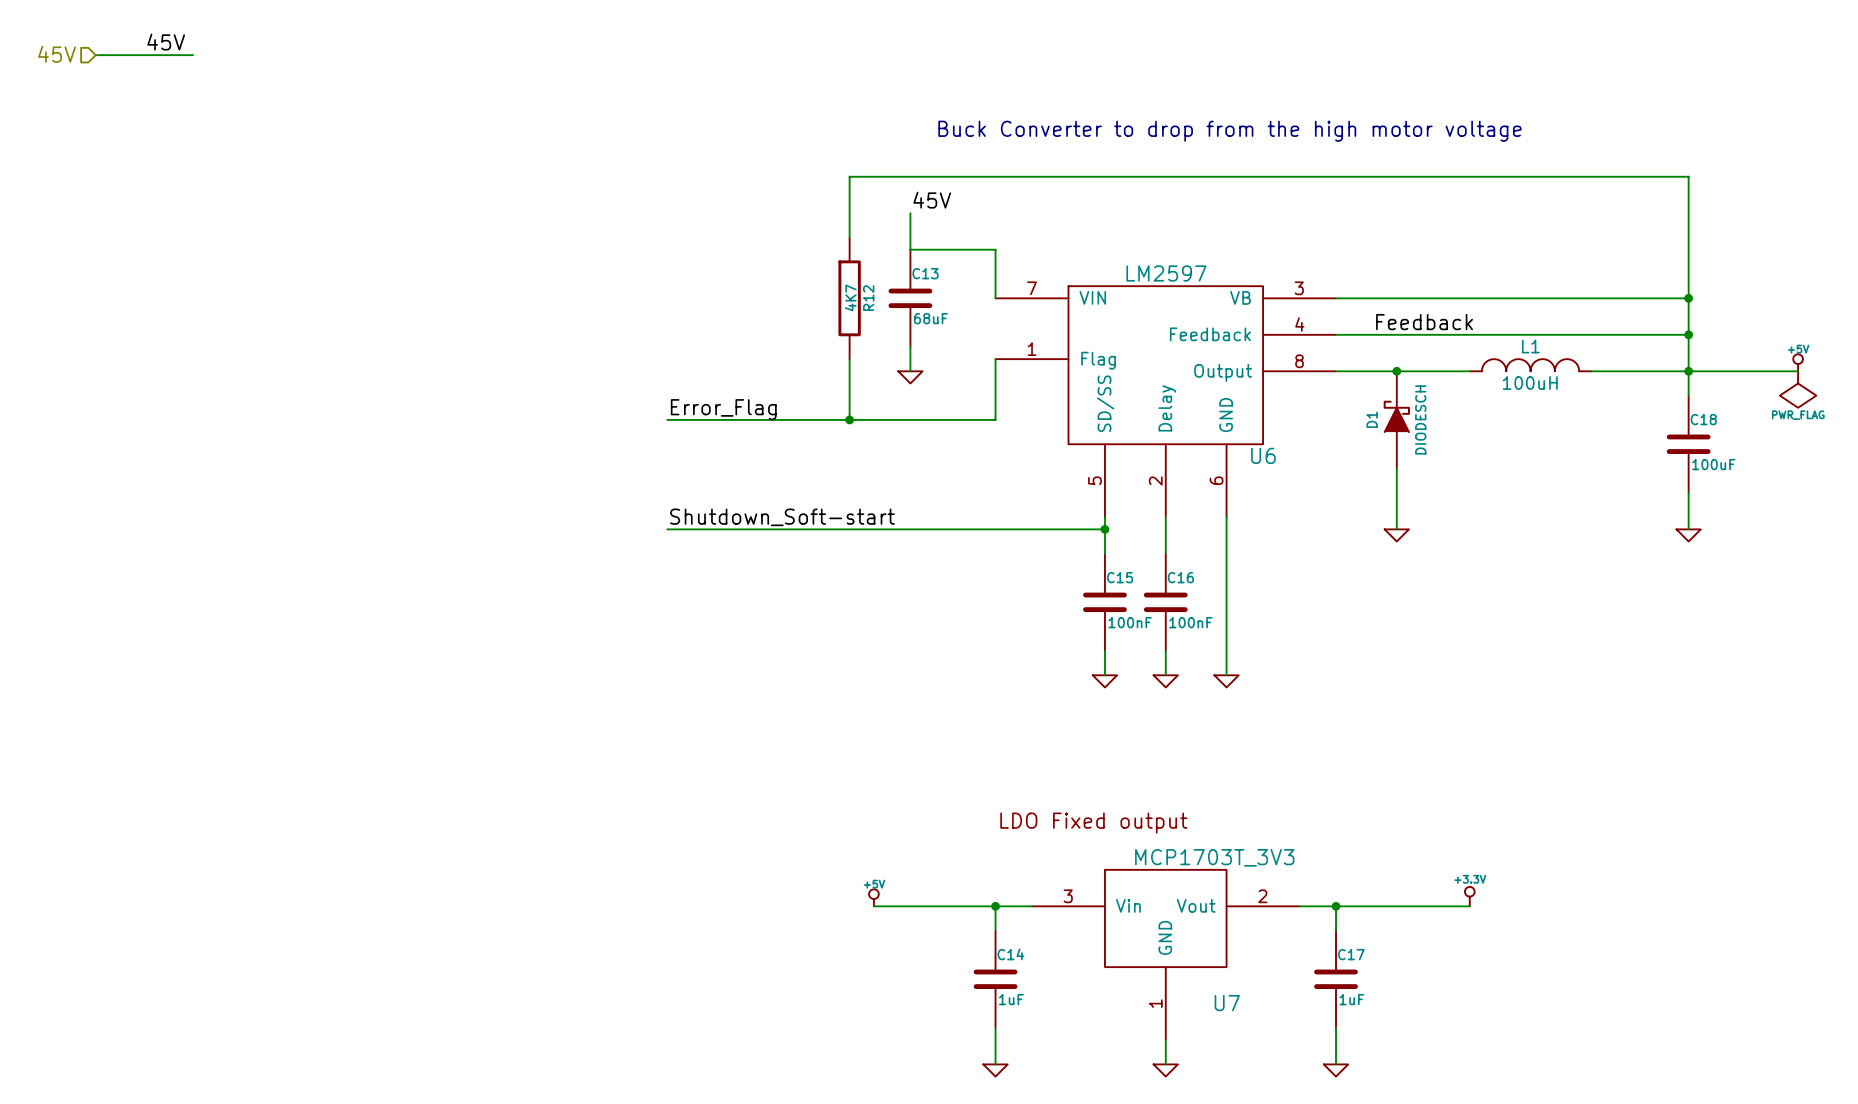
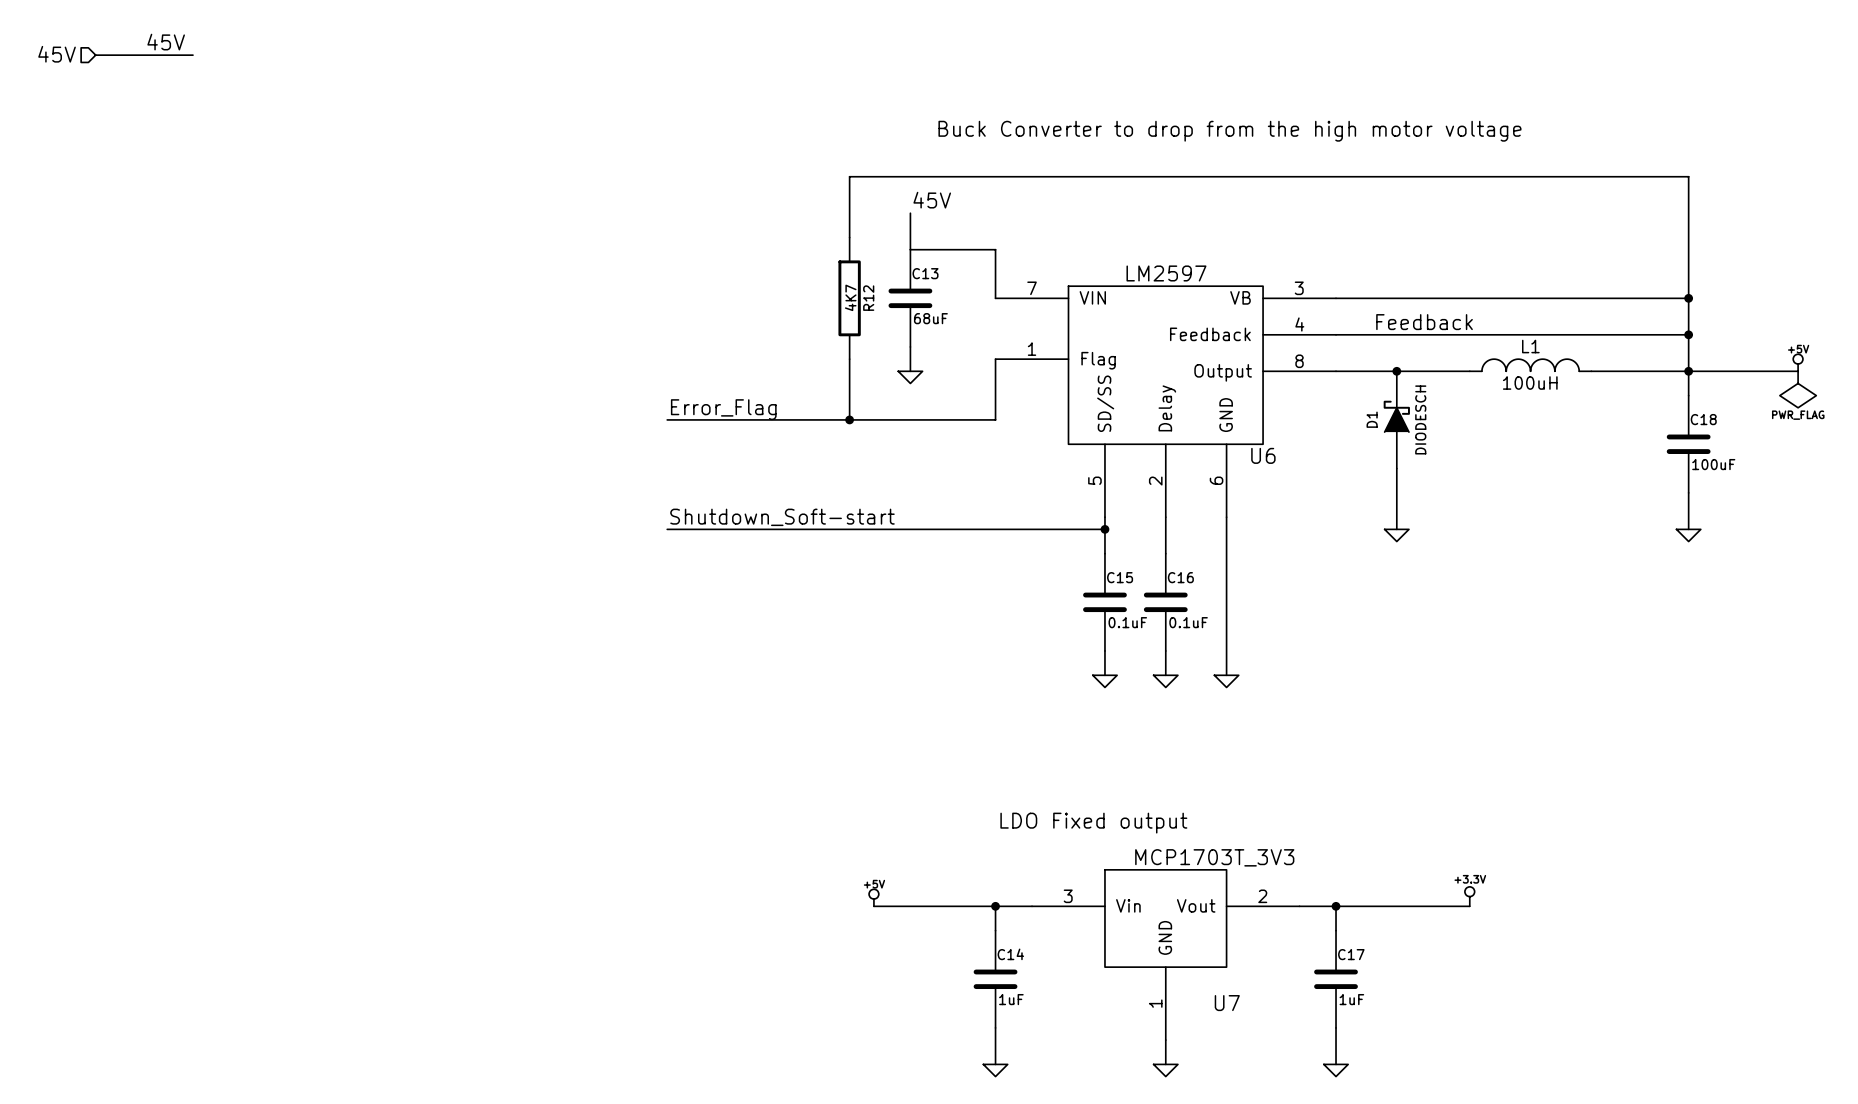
C15 value: 100nF (1130, 622) -> 0.1uF (1127, 622)
C16 value: 100nF (1190, 622) -> 0.1uF (1188, 622)

